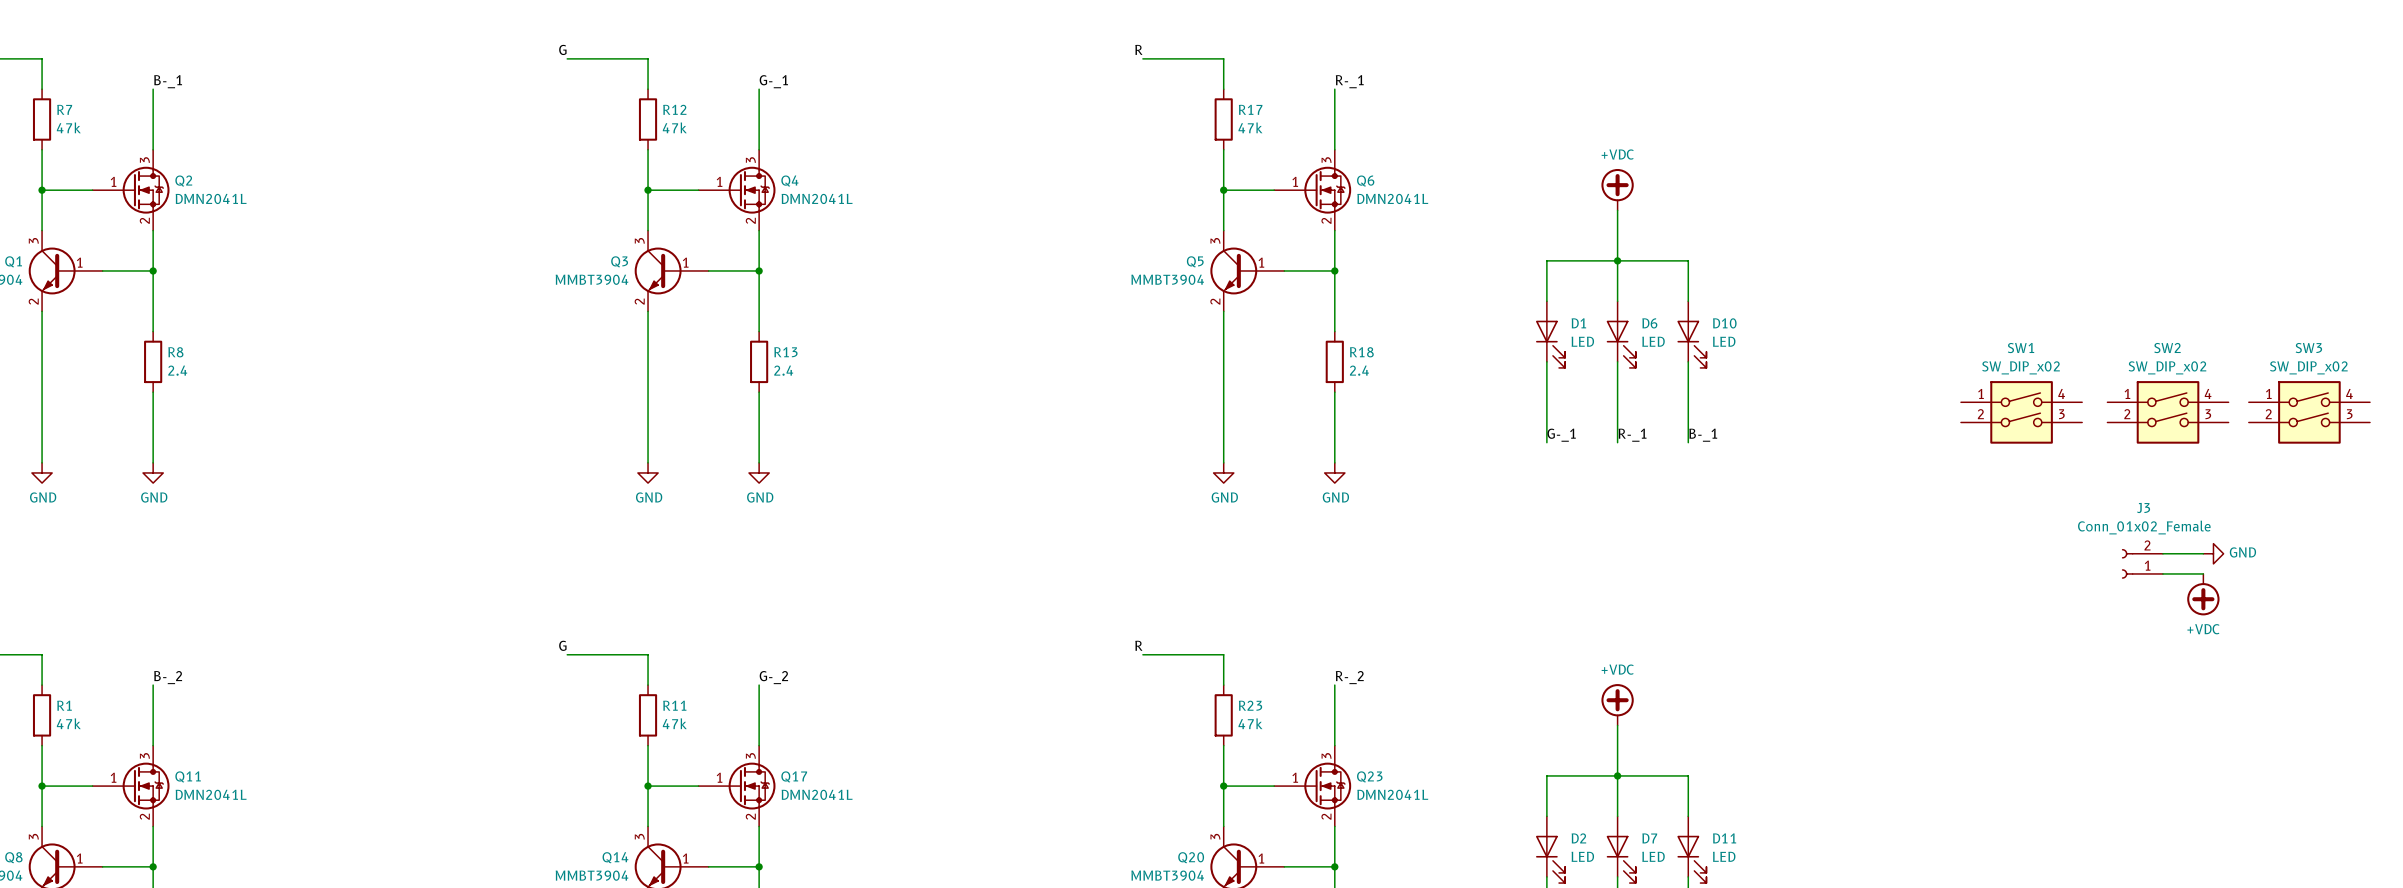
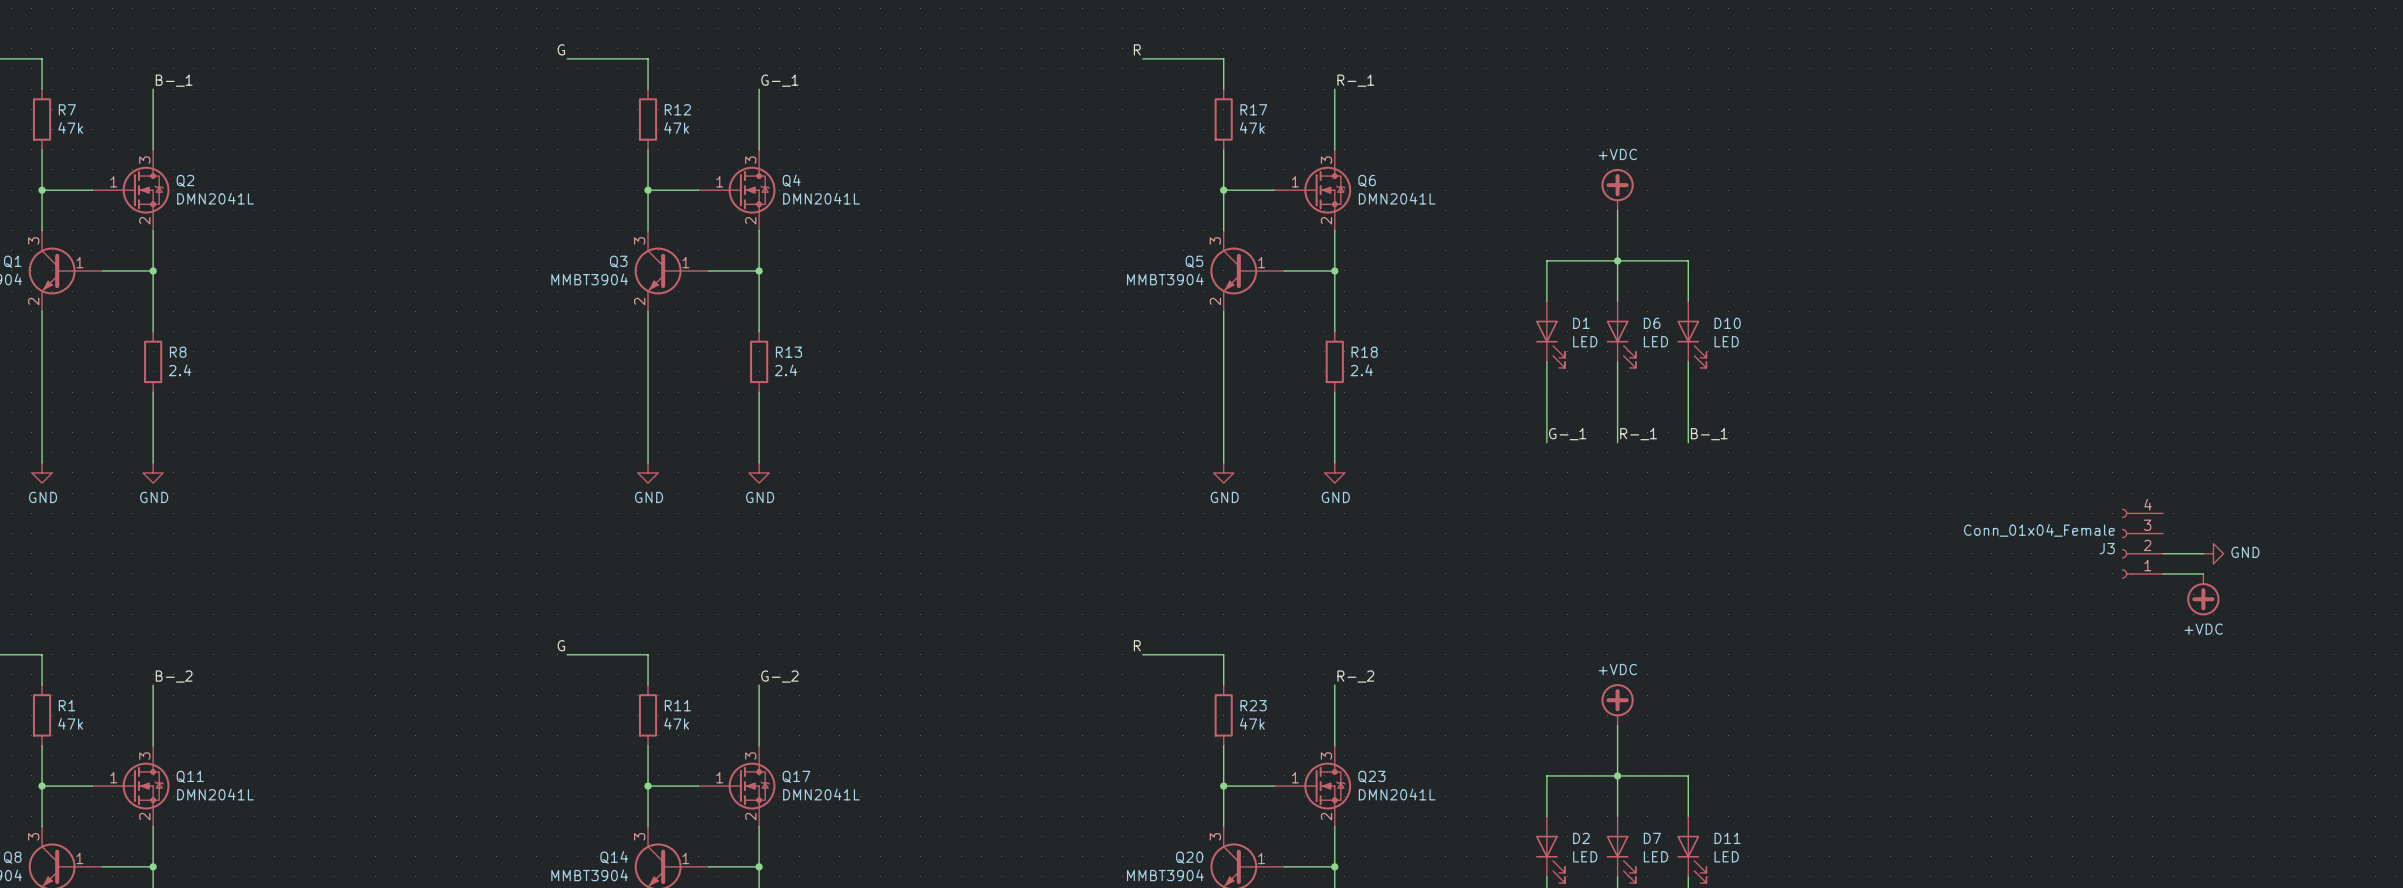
SW1: SW_DIP_x02 (2021, 412) -> none
SW2: SW_DIP_x02 (2168, 412) -> none
SW3: SW_DIP_x02 (2309, 412) -> none
J3 name position: J3 (2143, 508) -> J3 (2107, 548)
J3 value: Conn_01x02_Female (2144, 527) -> Conn_01x04_Female (2039, 530)
J3 symbol: [2121, 549, 2163, 579] -> [2121, 508, 2163, 579]

